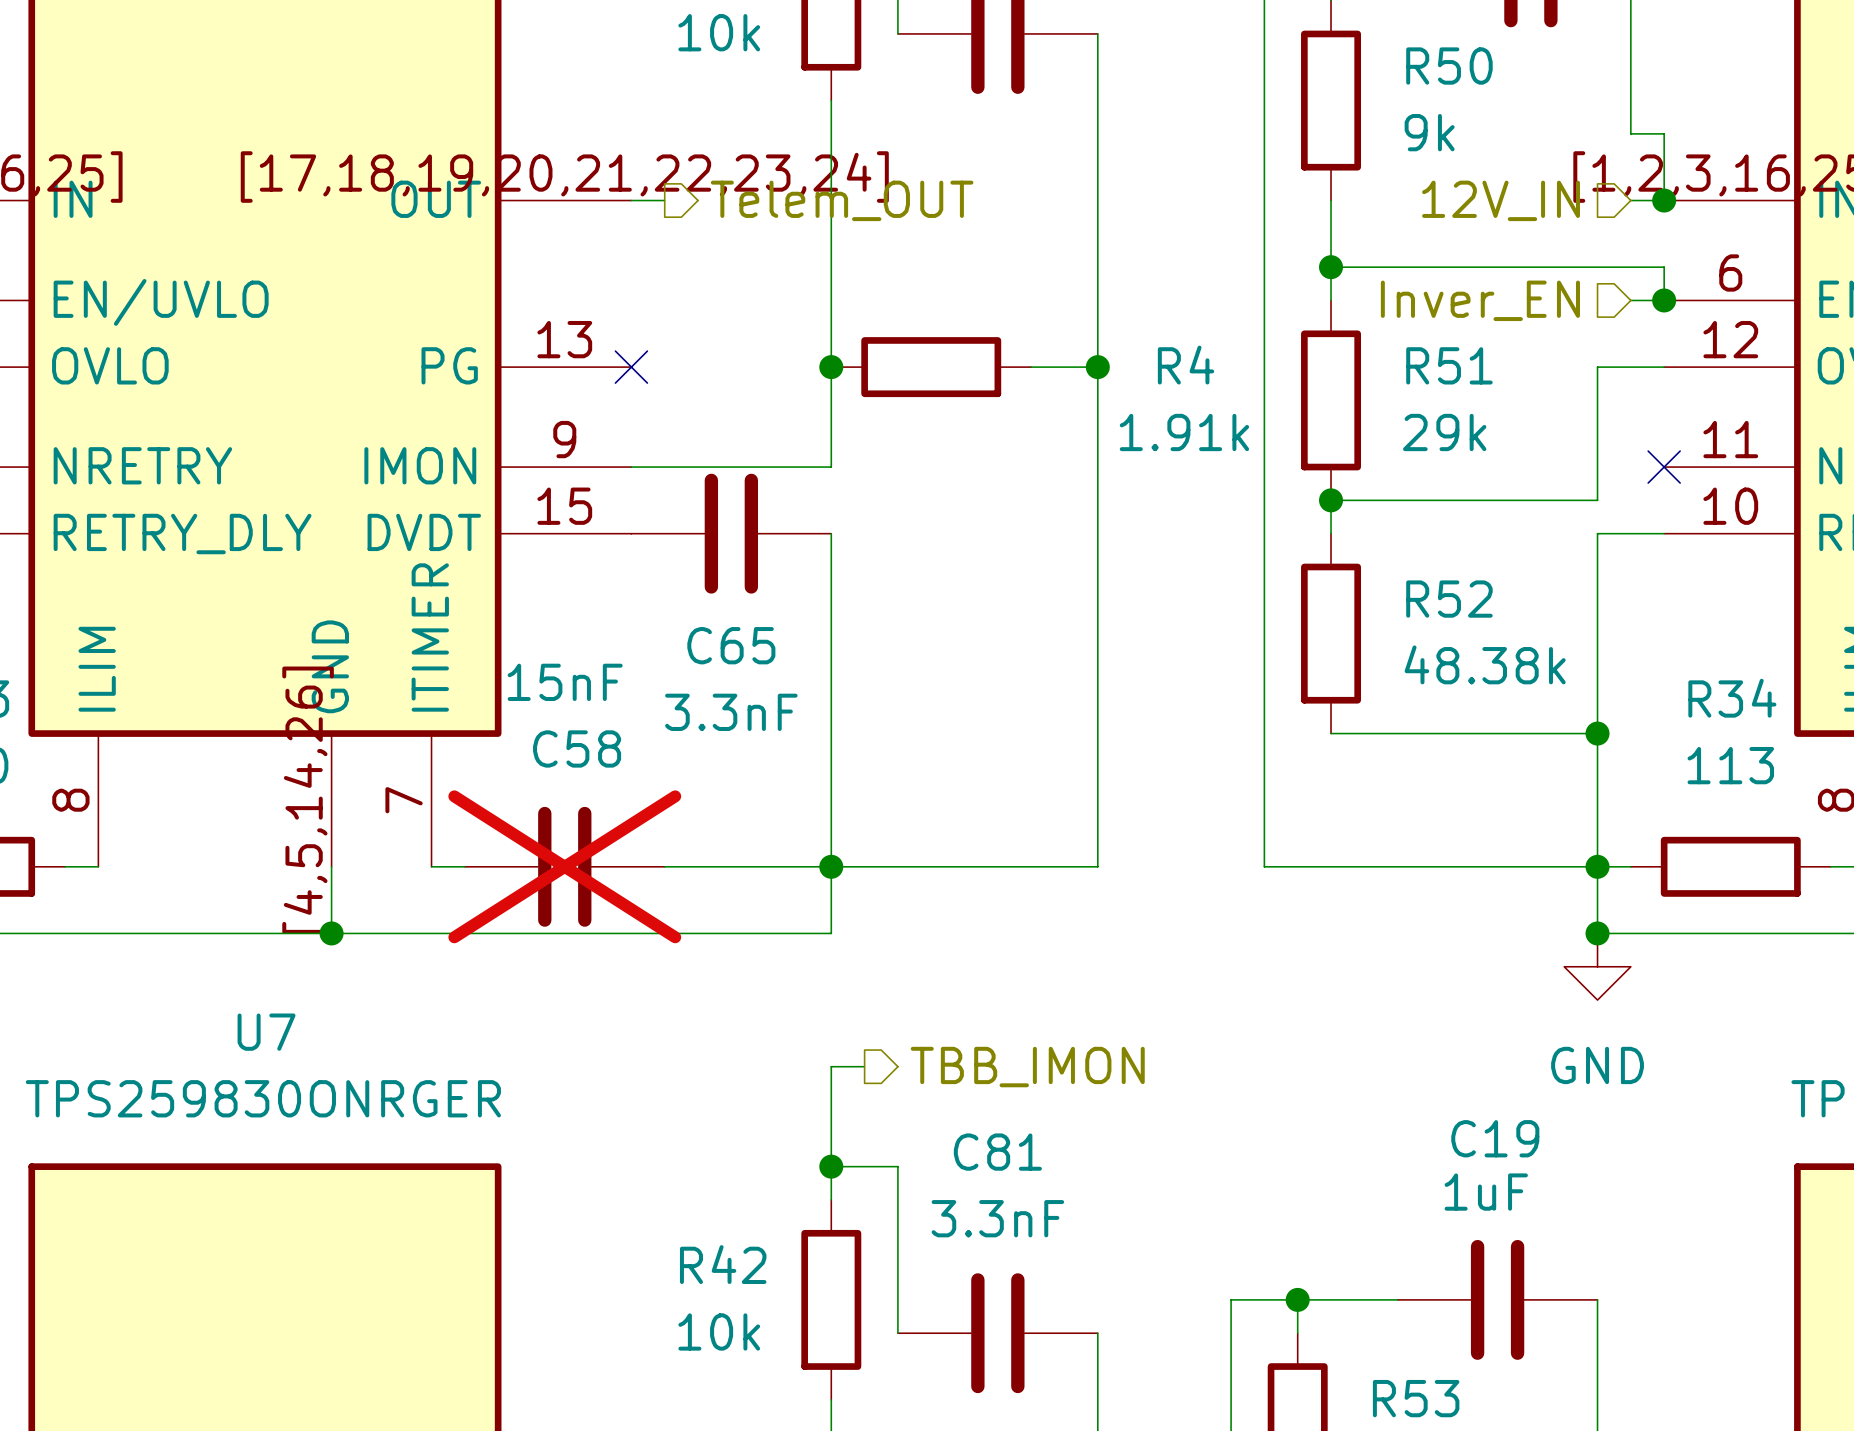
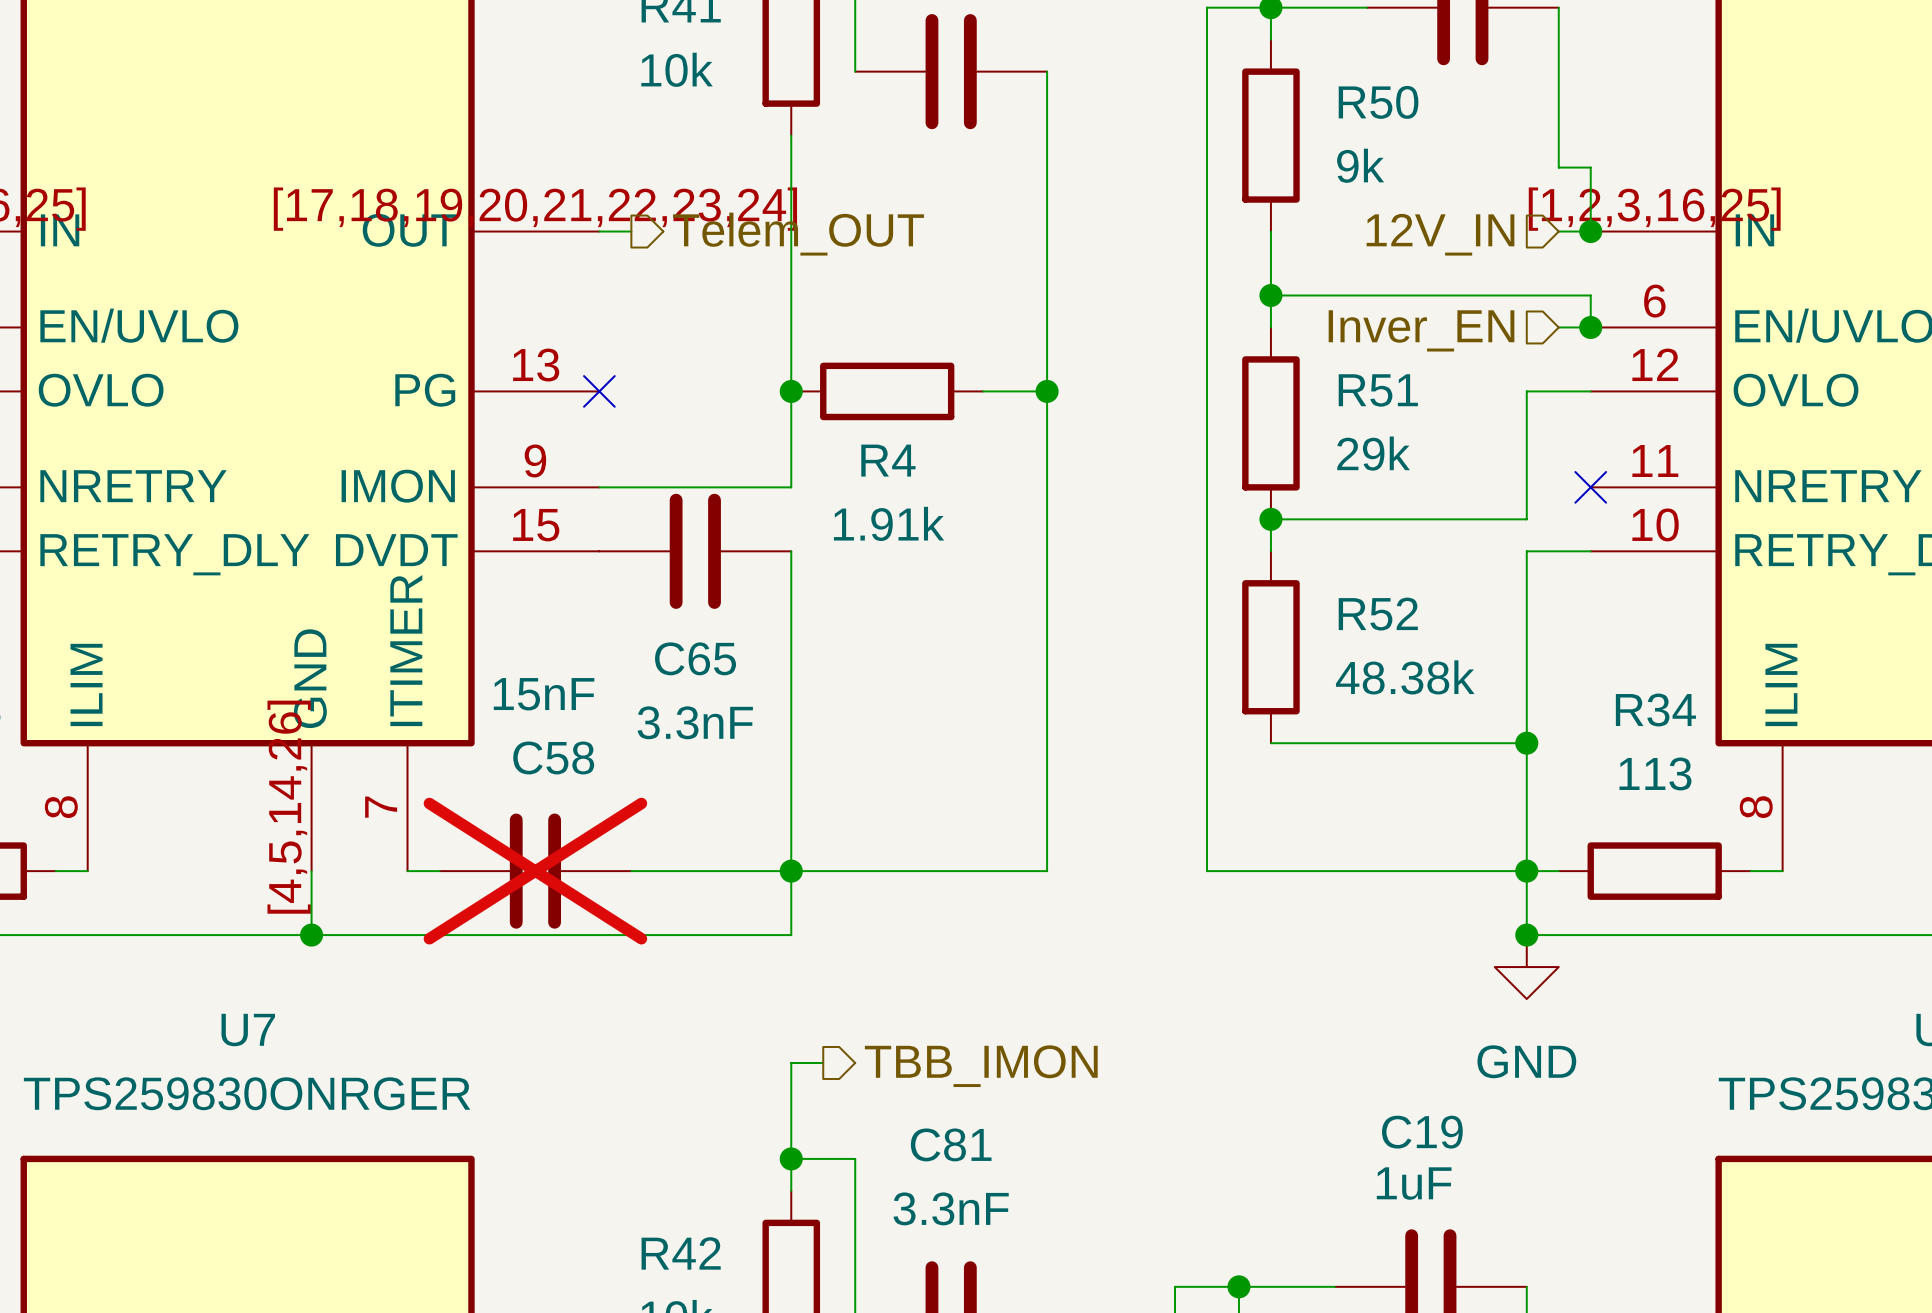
R4 name position: R4 (1186, 365) -> R4 (888, 460)
R4 value position: 1.91k (1184, 432) -> 1.91k (889, 523)

